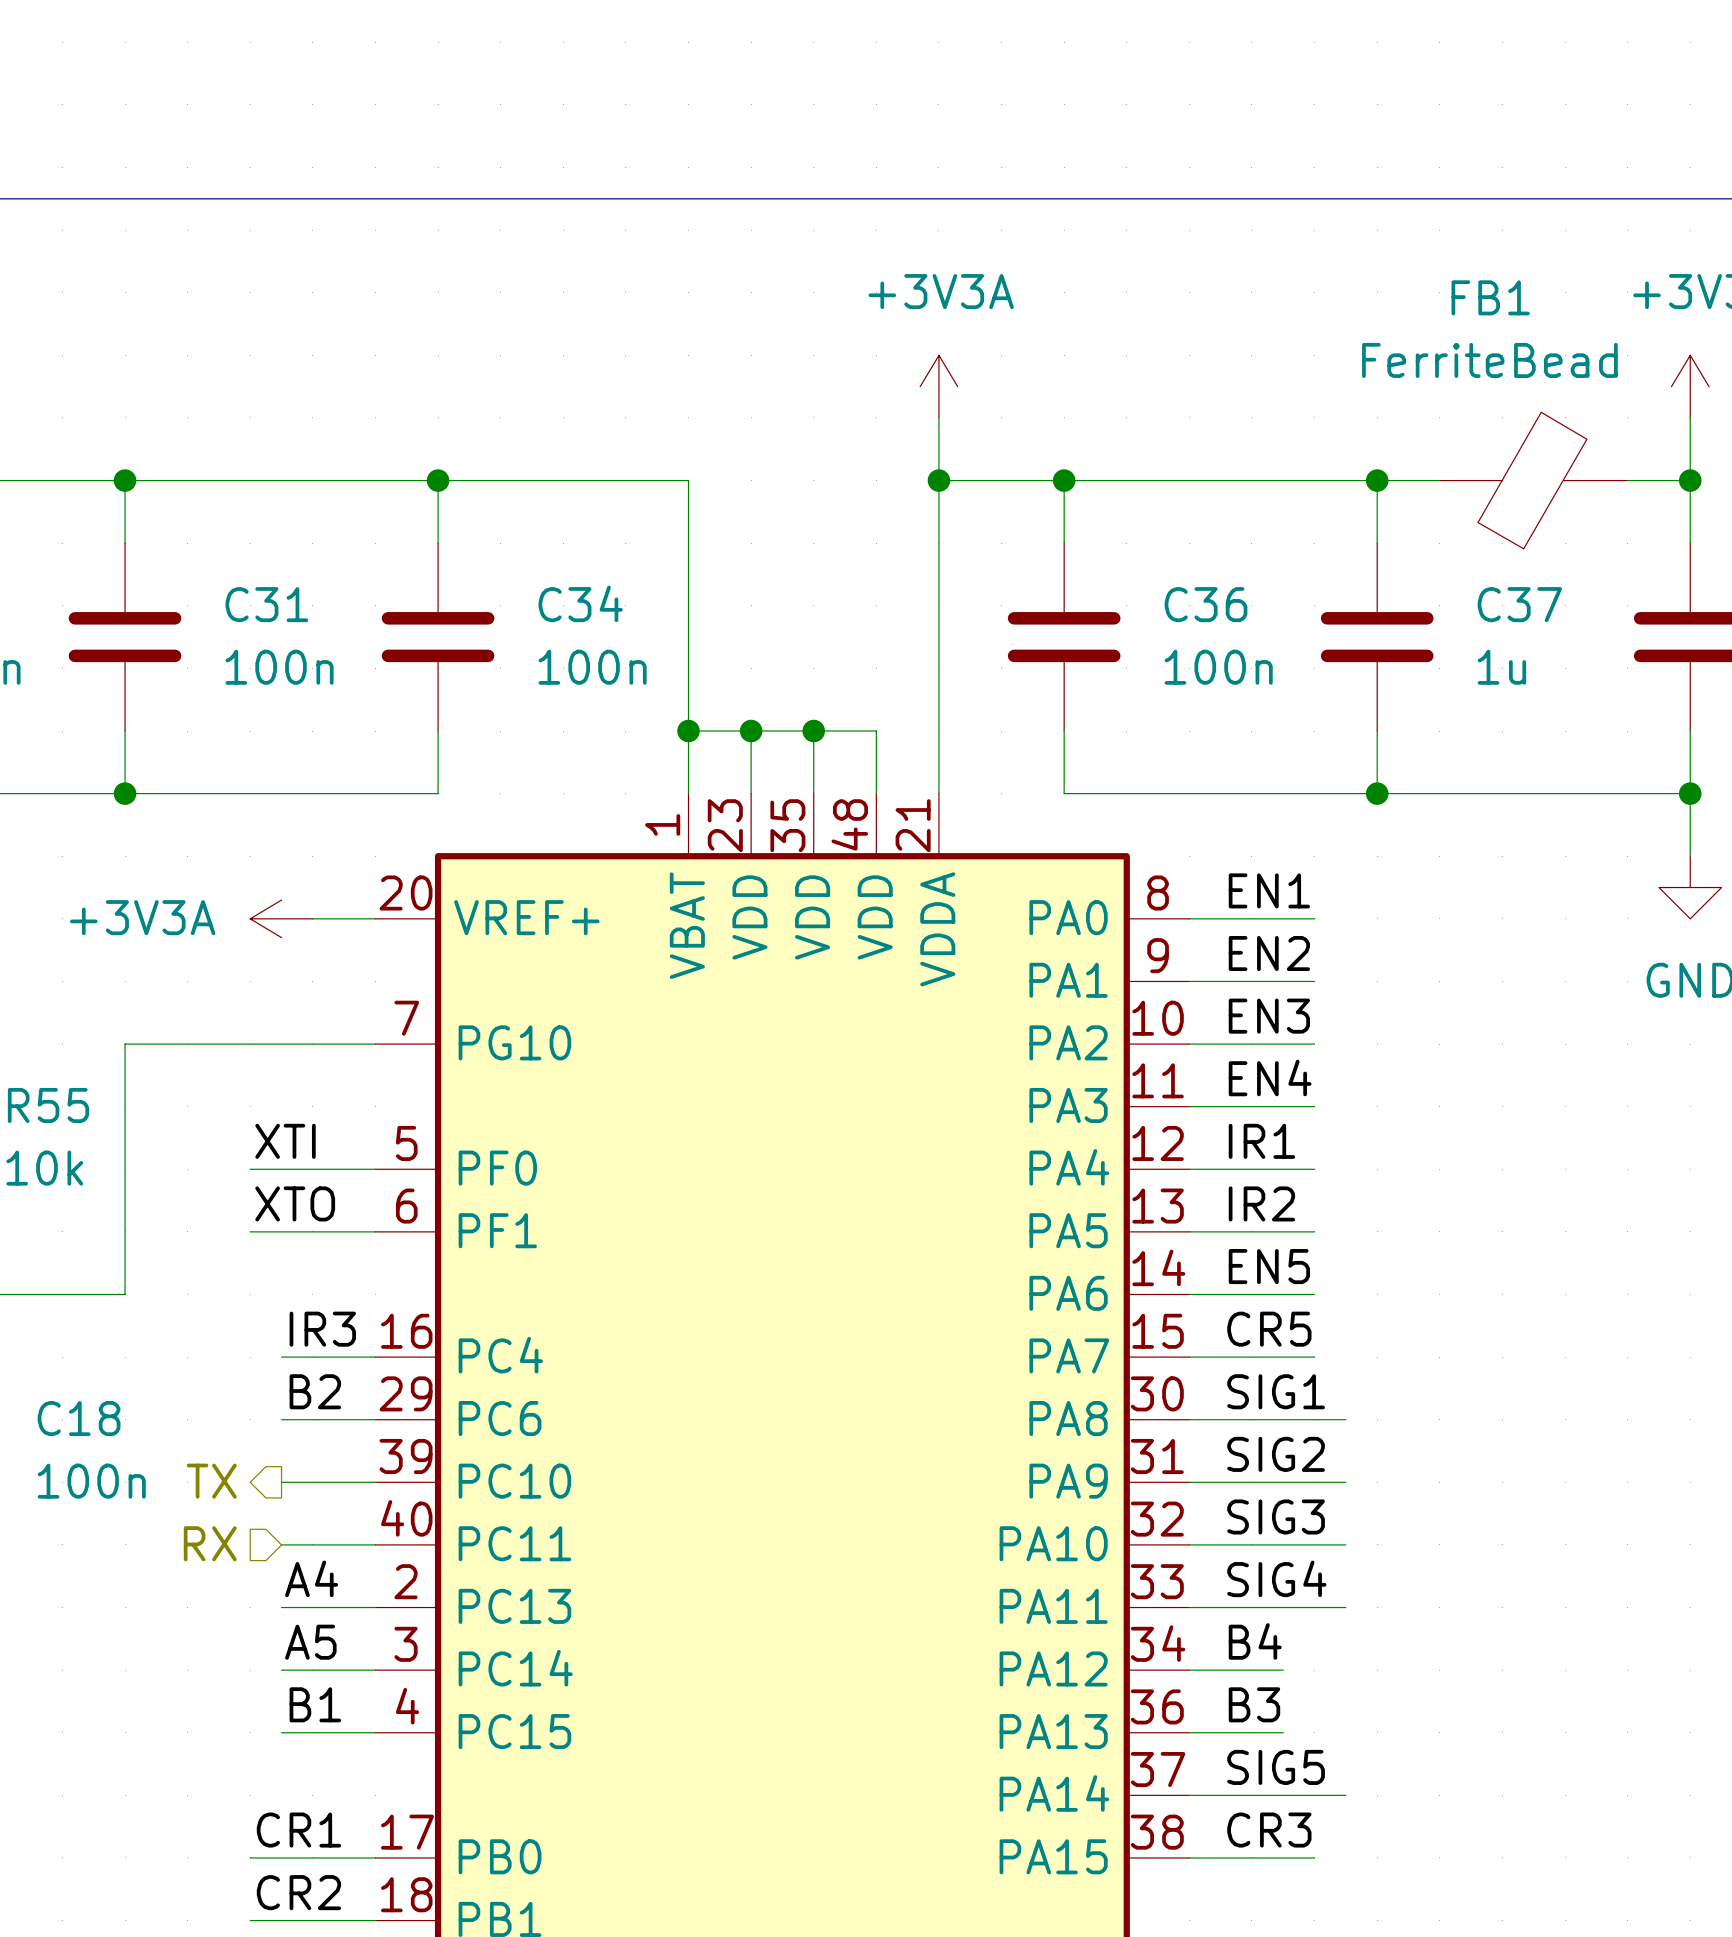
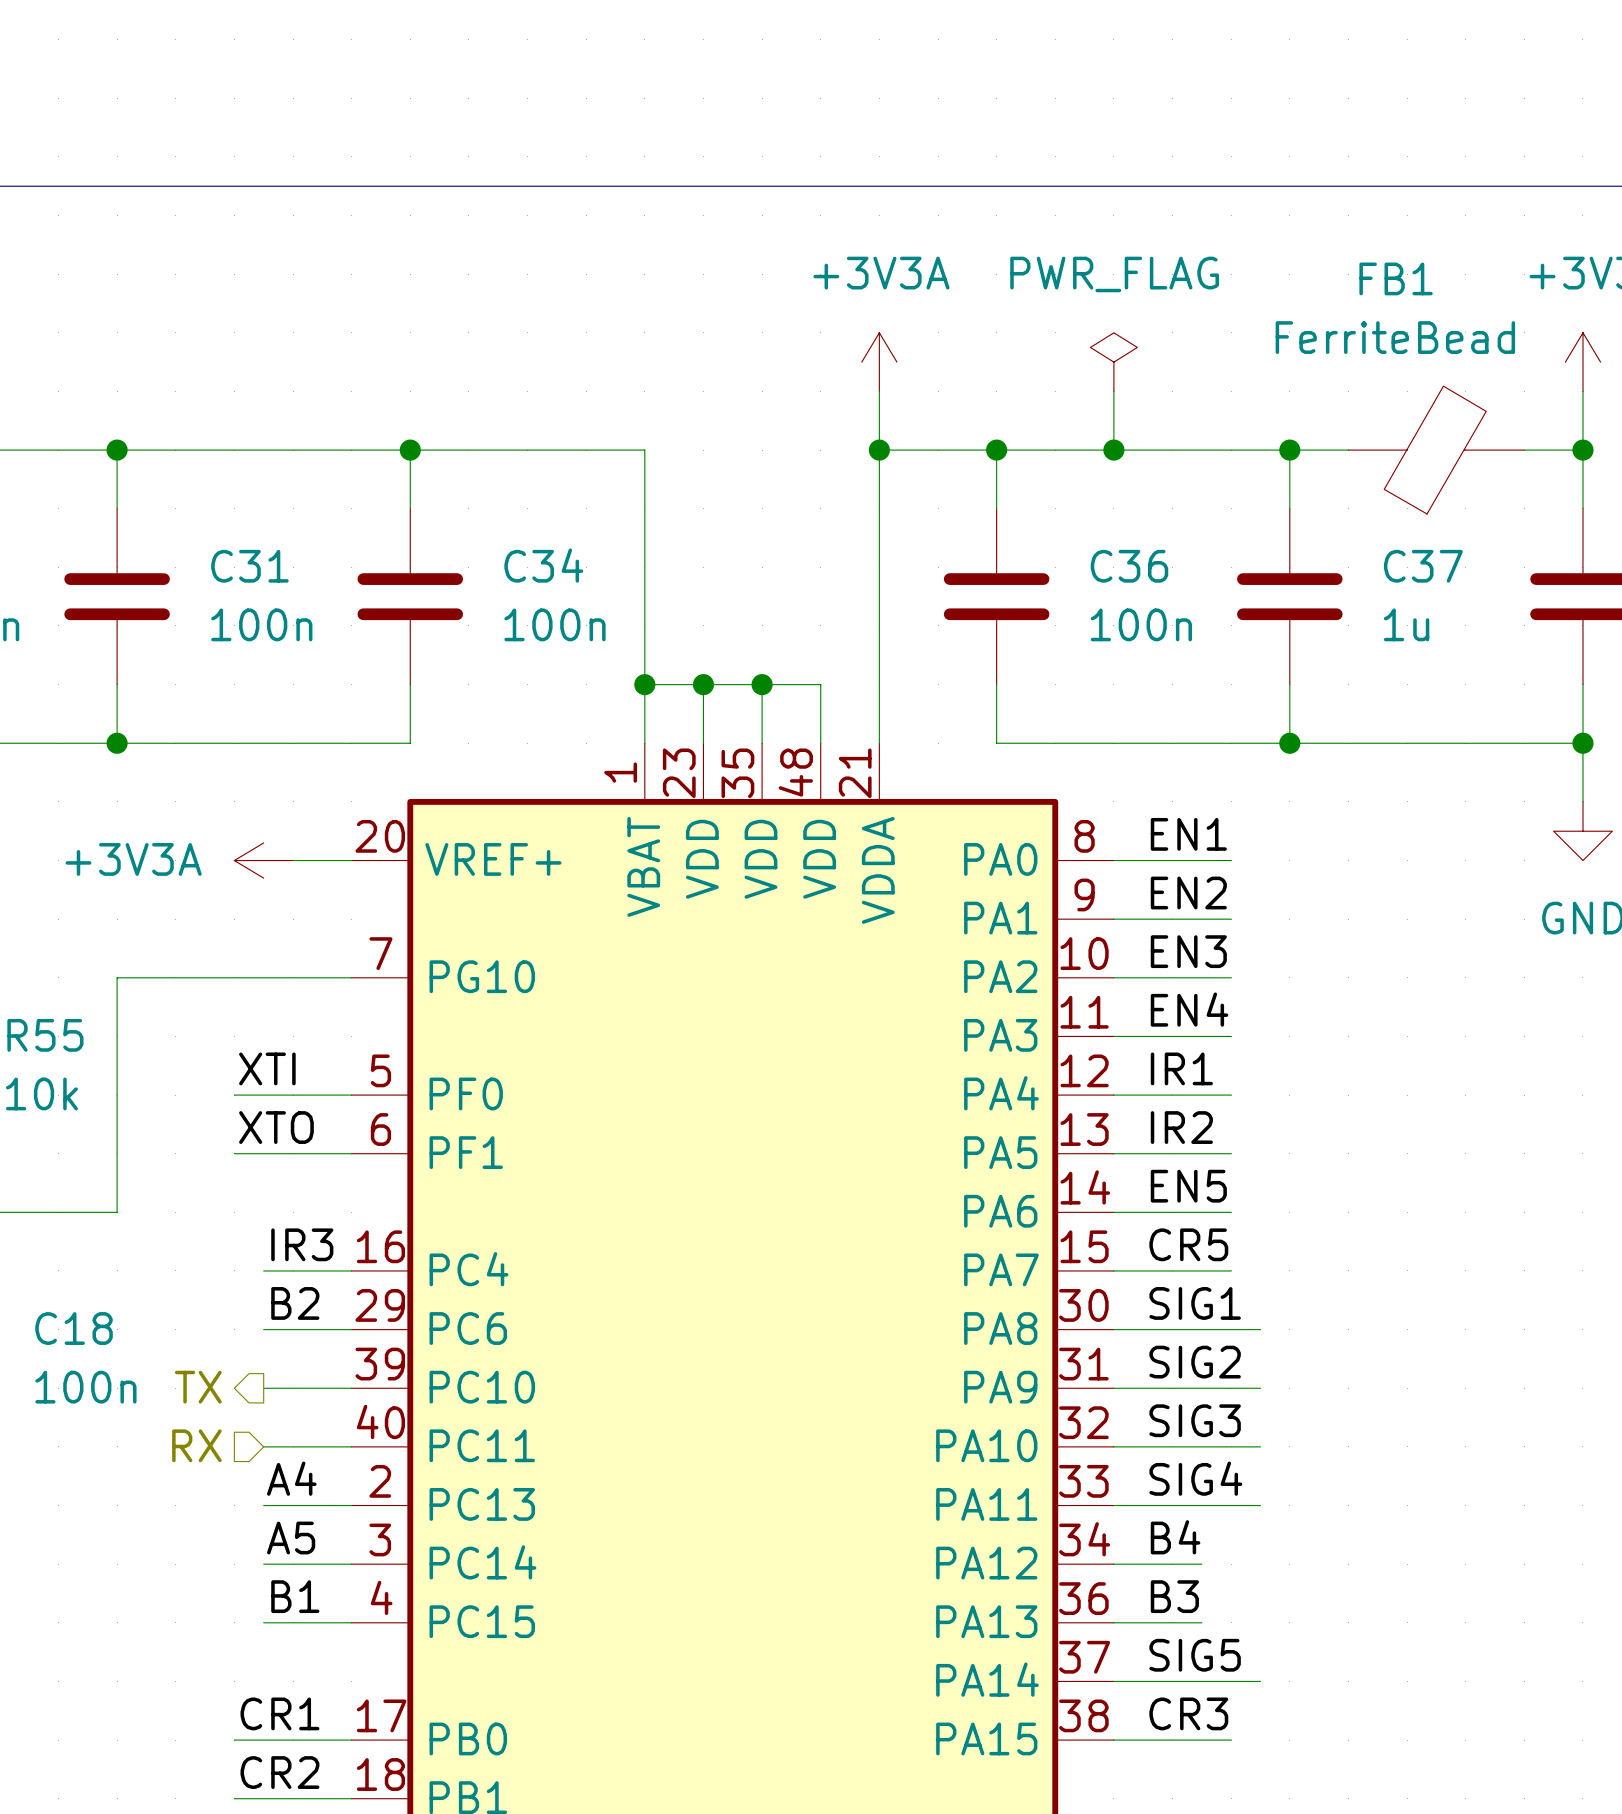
power symbol: none -> PWR_FLAG (1113, 362)
wire: none -> (1113, 391) (1113, 450)
junction: none -> (1113, 450)

